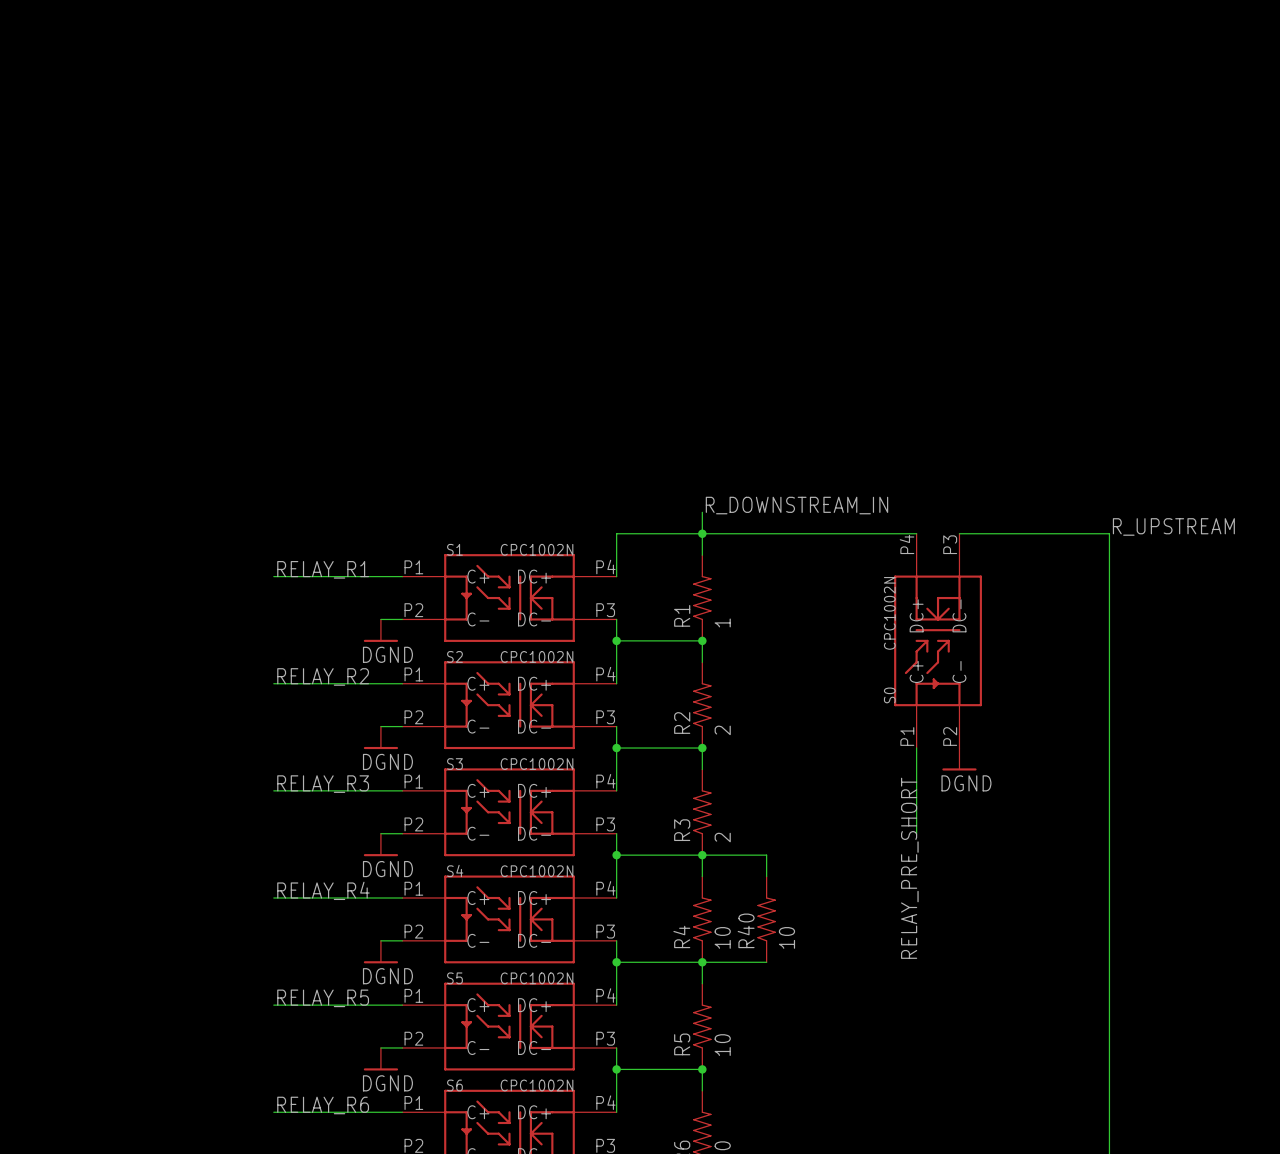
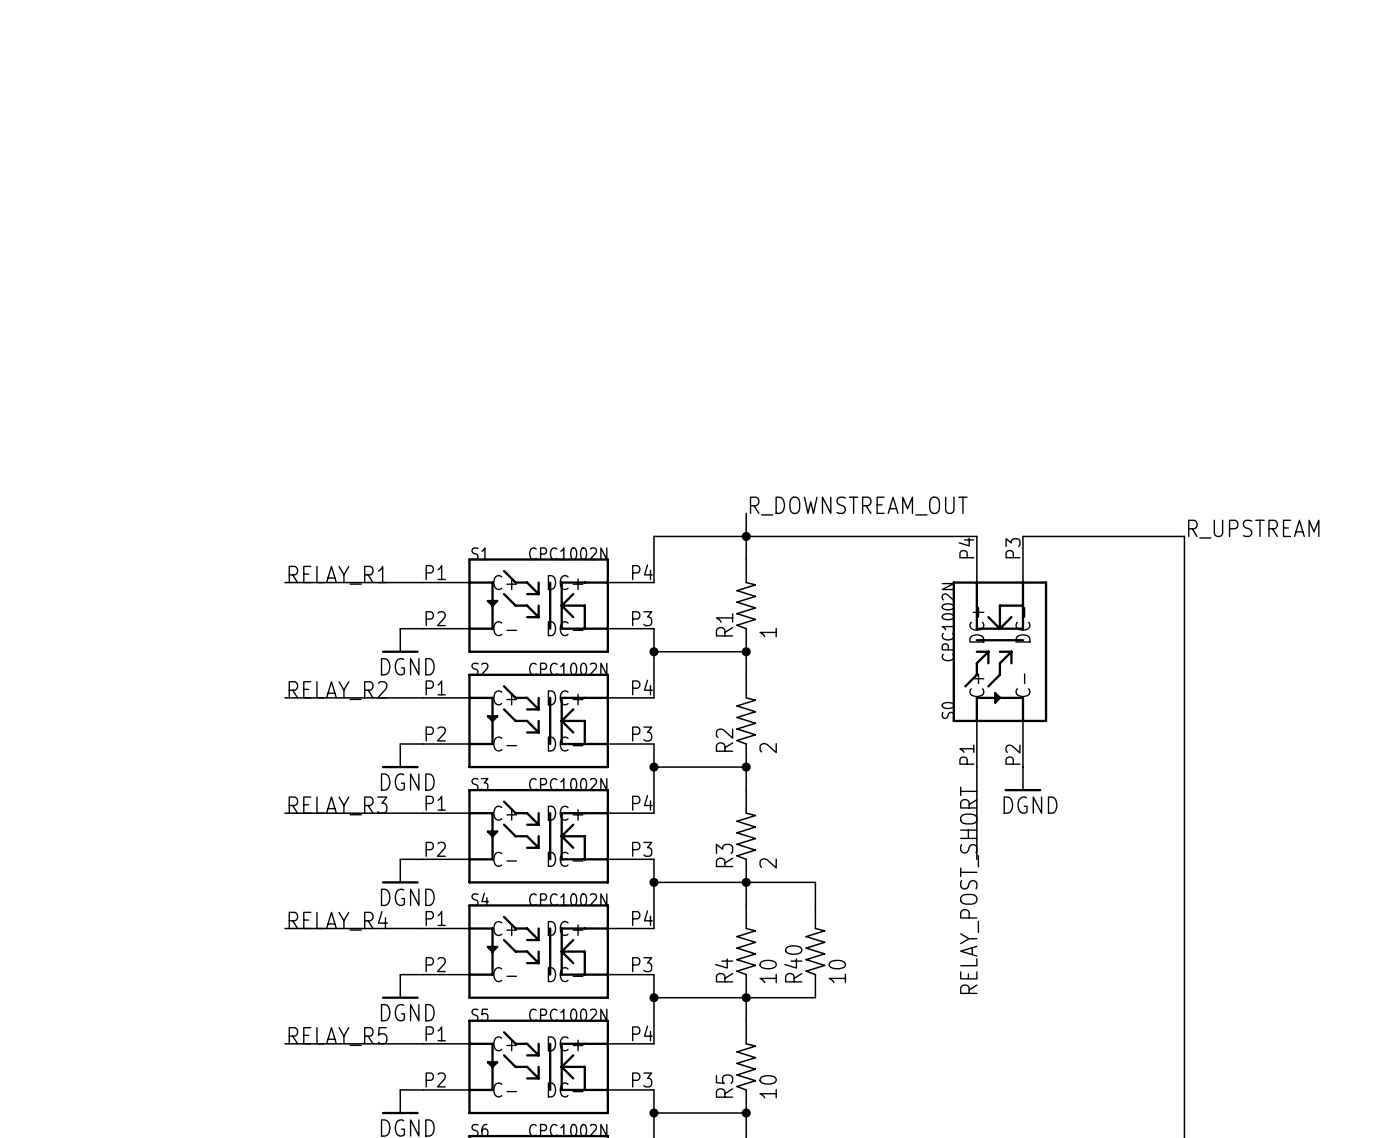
label: R_DOWNSTREAM_IN (796, 505) -> R_DOWNSTREAM_OUT (858, 506)
label: RELAY_PRE_SHORT (909, 868) -> RELAY_POST_SHORT (969, 890)

